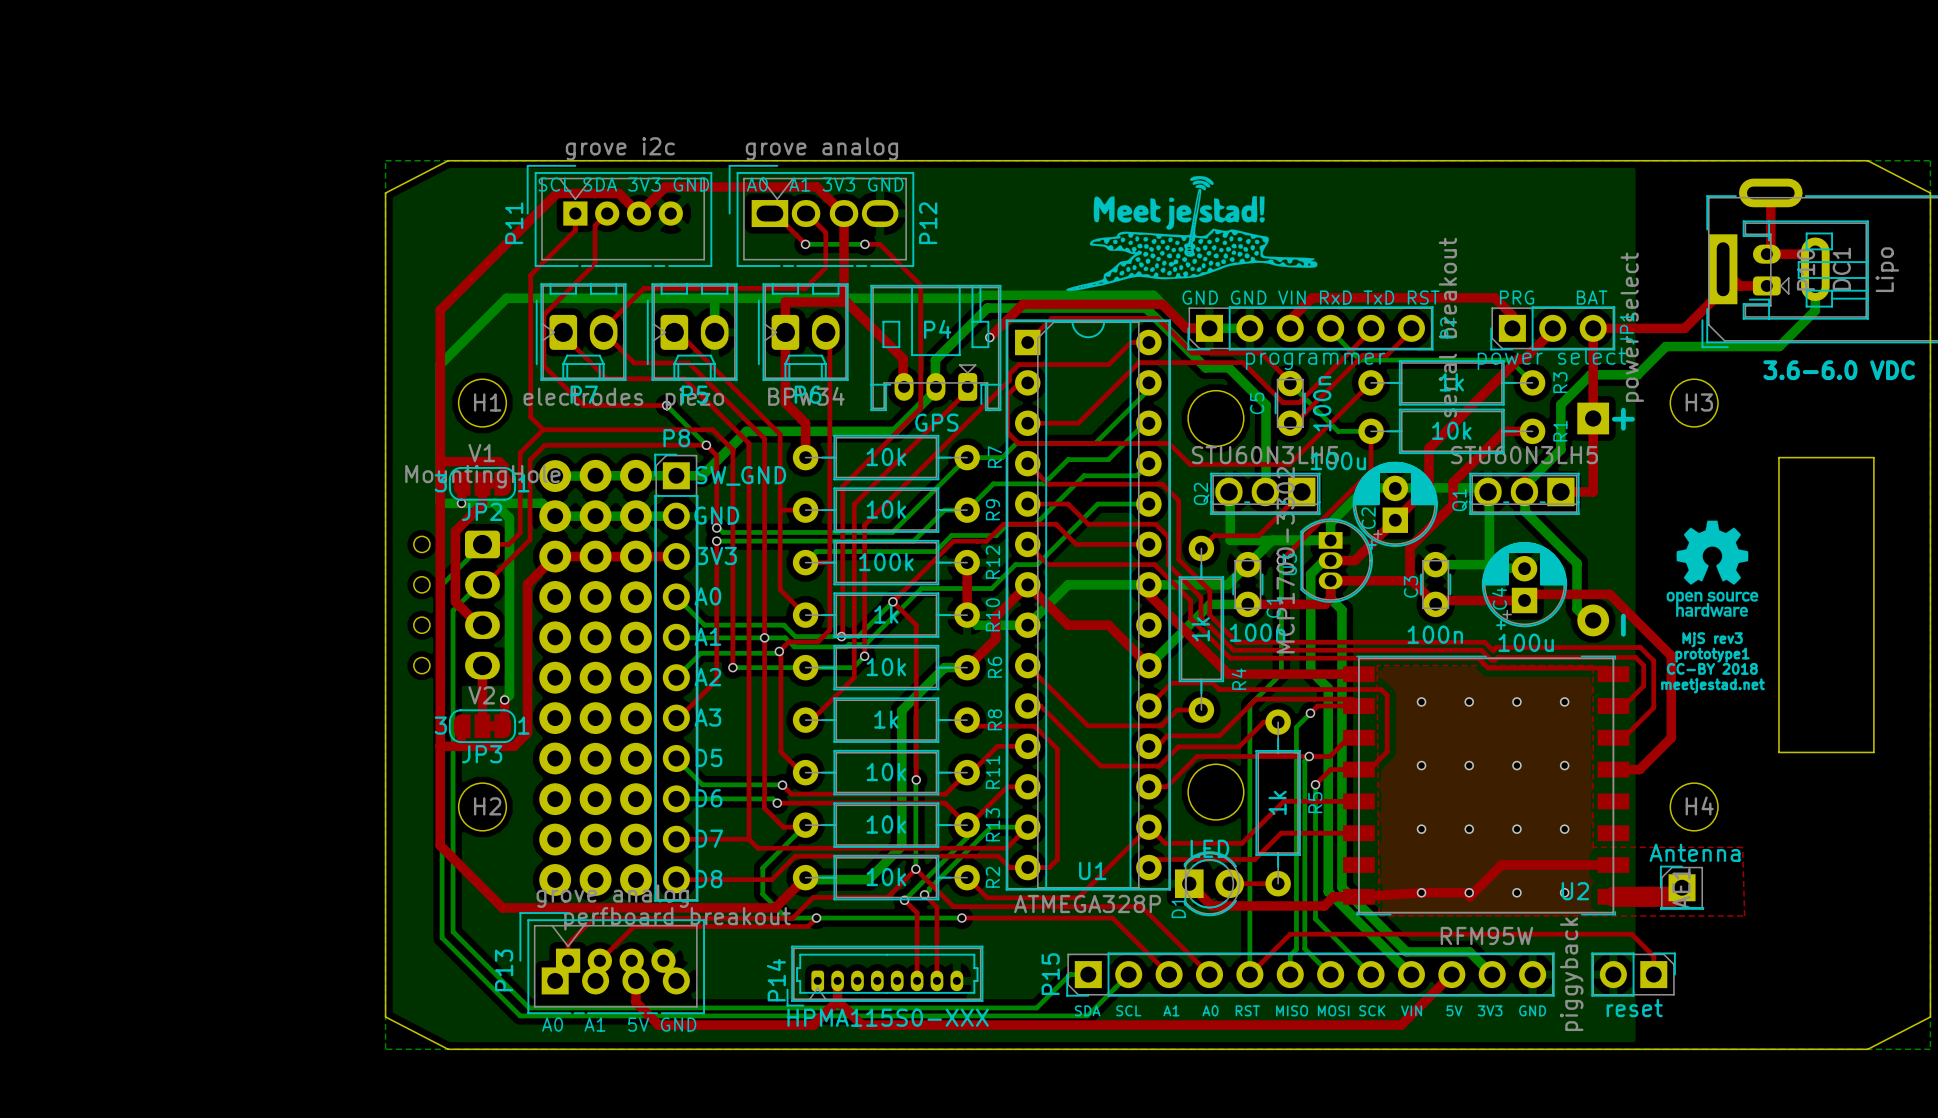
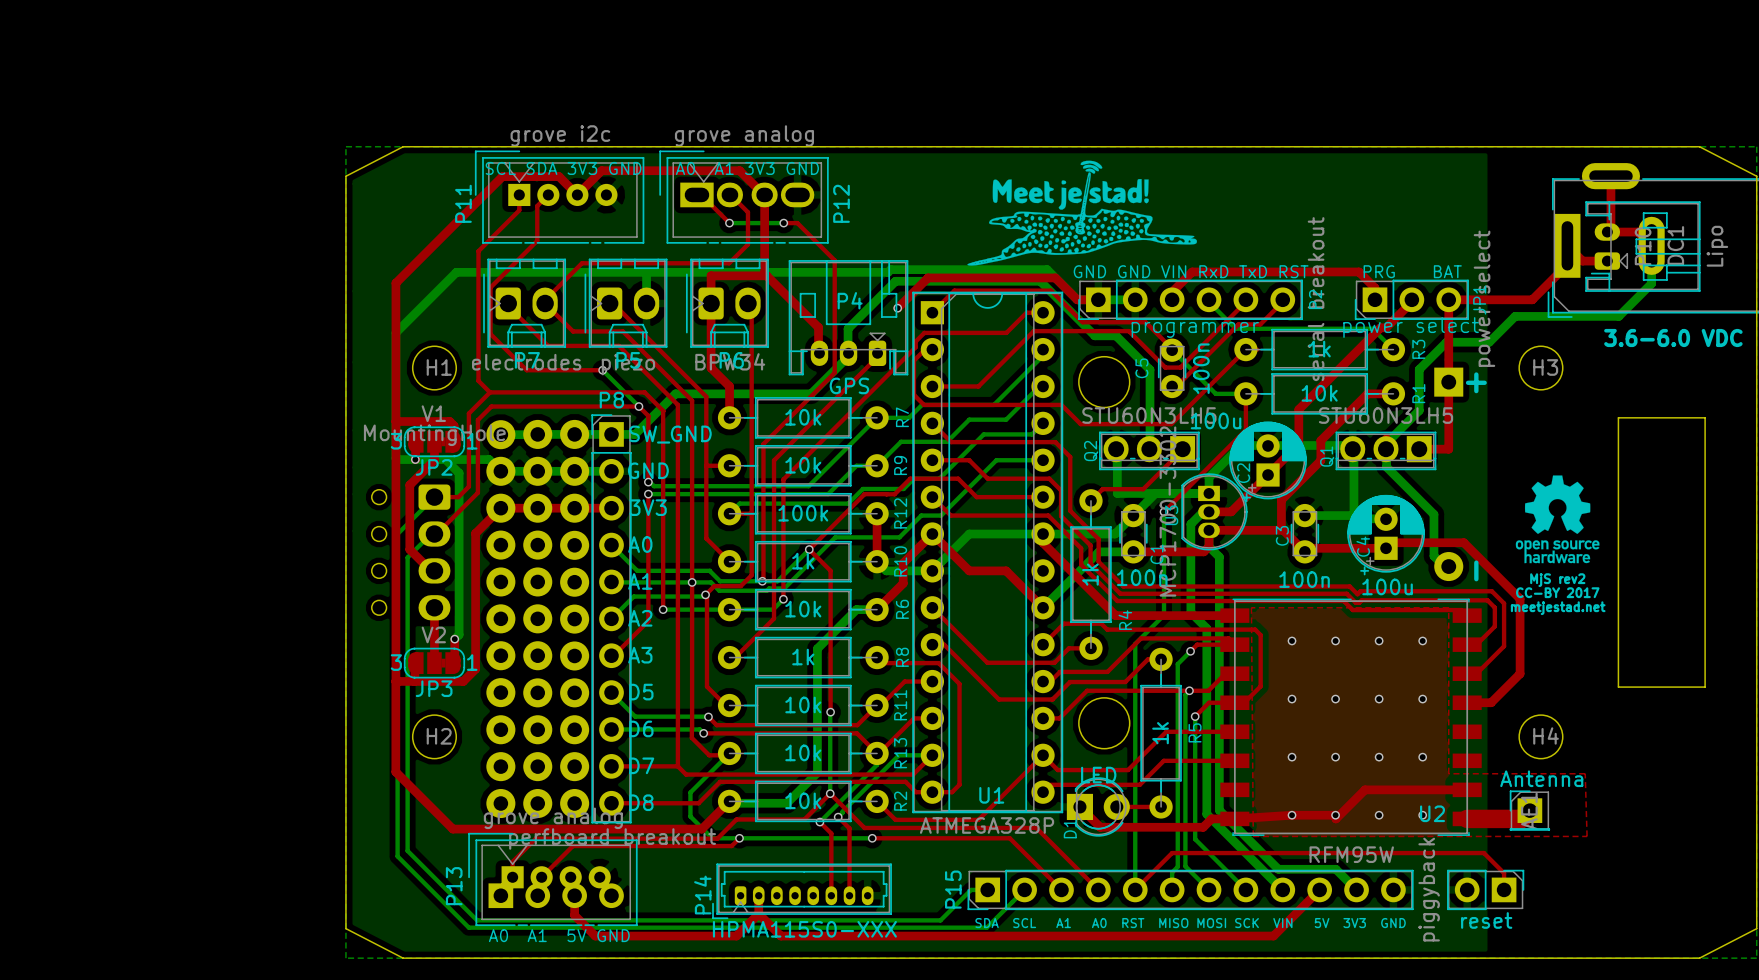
text: MjS rev3 (1712, 639) -> MjS rev2 (1557, 580)
text: prototype1 (1712, 655) -> CC-BY 2017 (1557, 592)
text: CC-BY 2018 (1712, 668) -> meetjestad.net (1558, 608)
text: meetjestad.net (1713, 685) -> none

